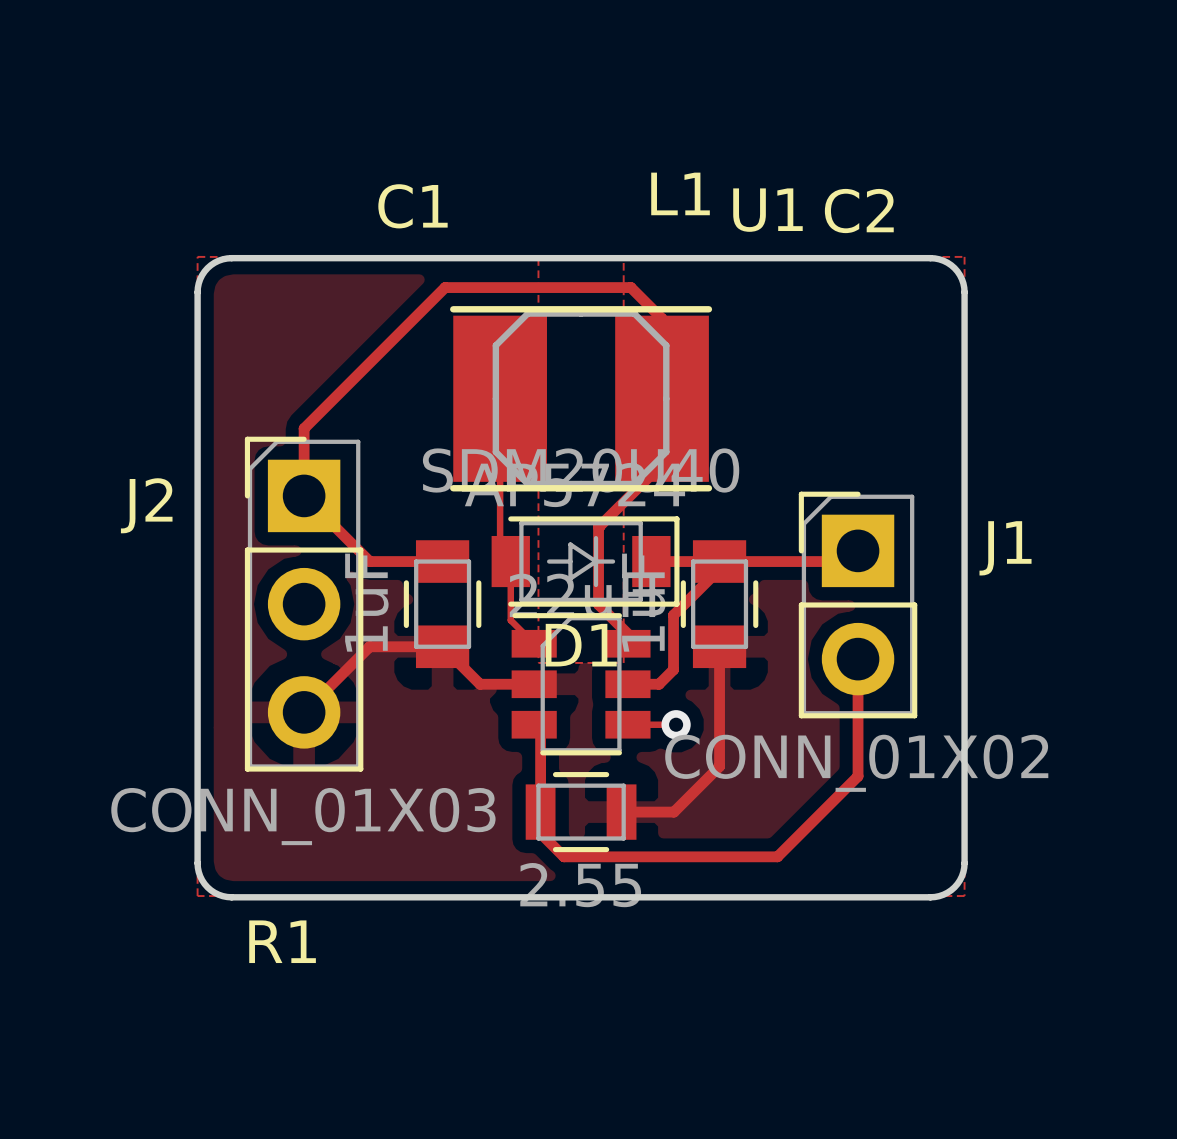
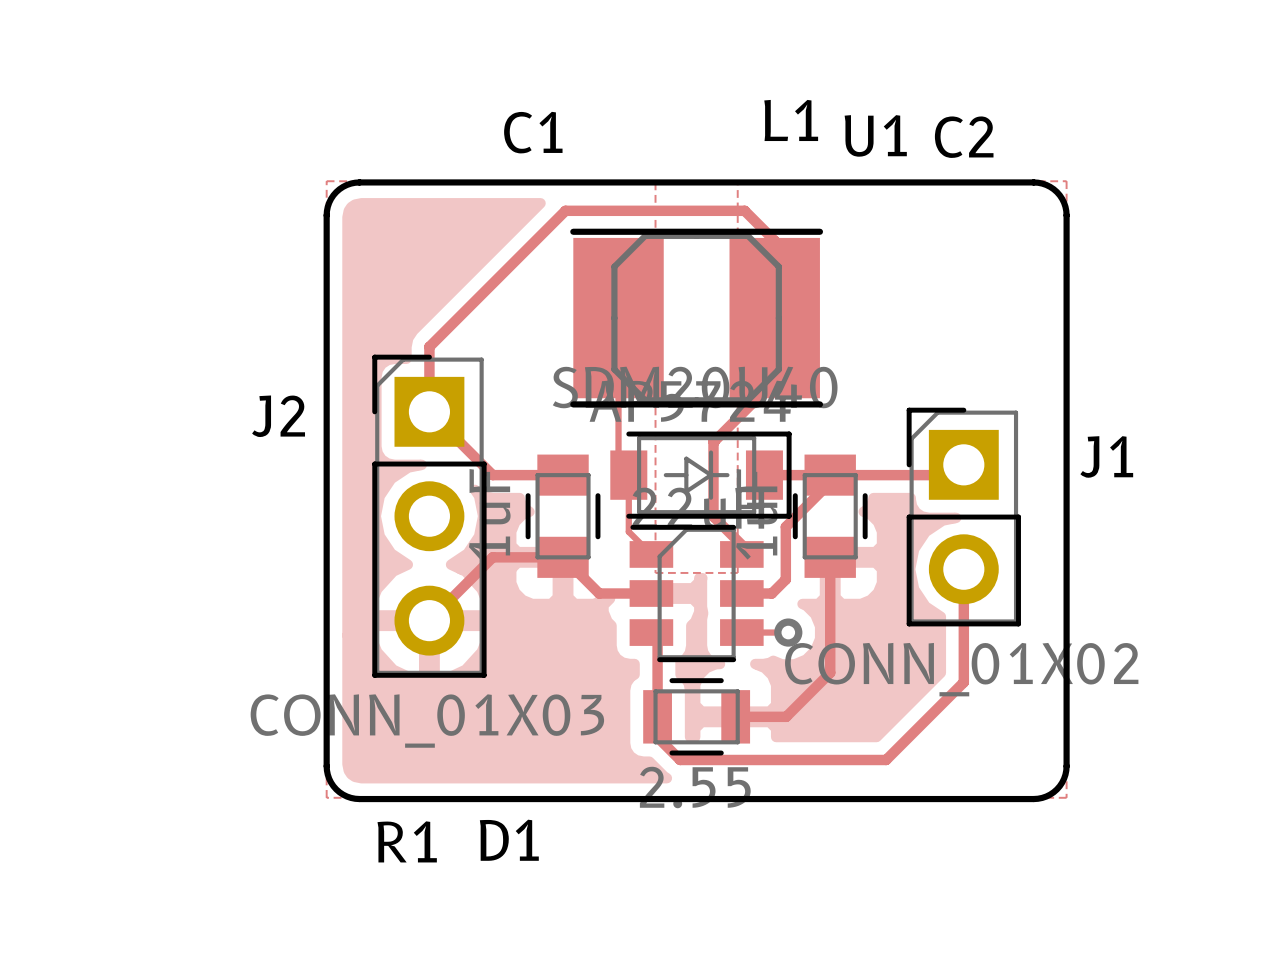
D1 name position: D1 (581, 645) -> D1 (509, 840)

